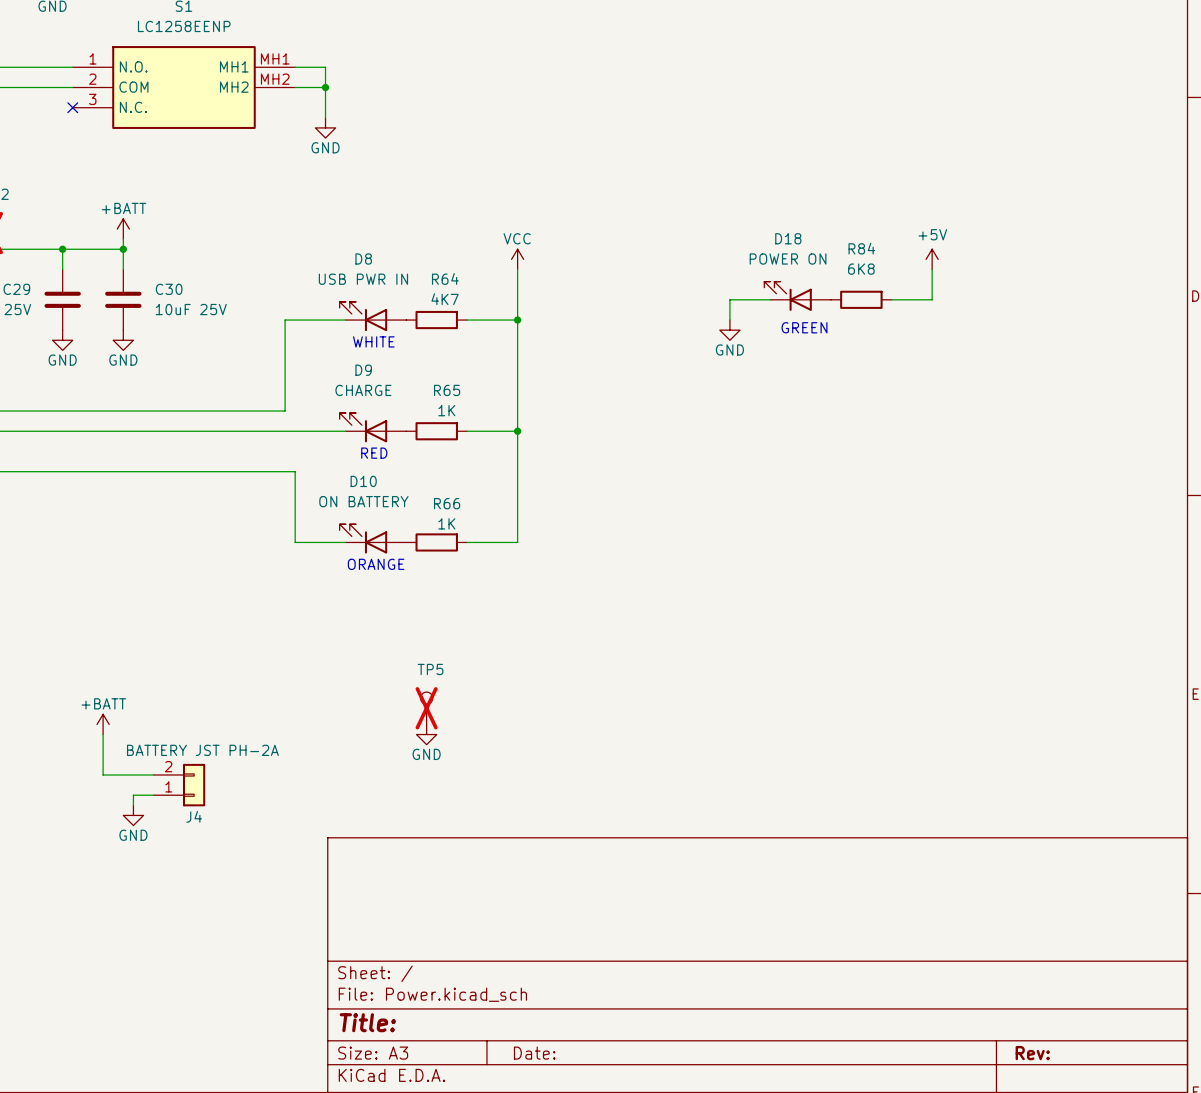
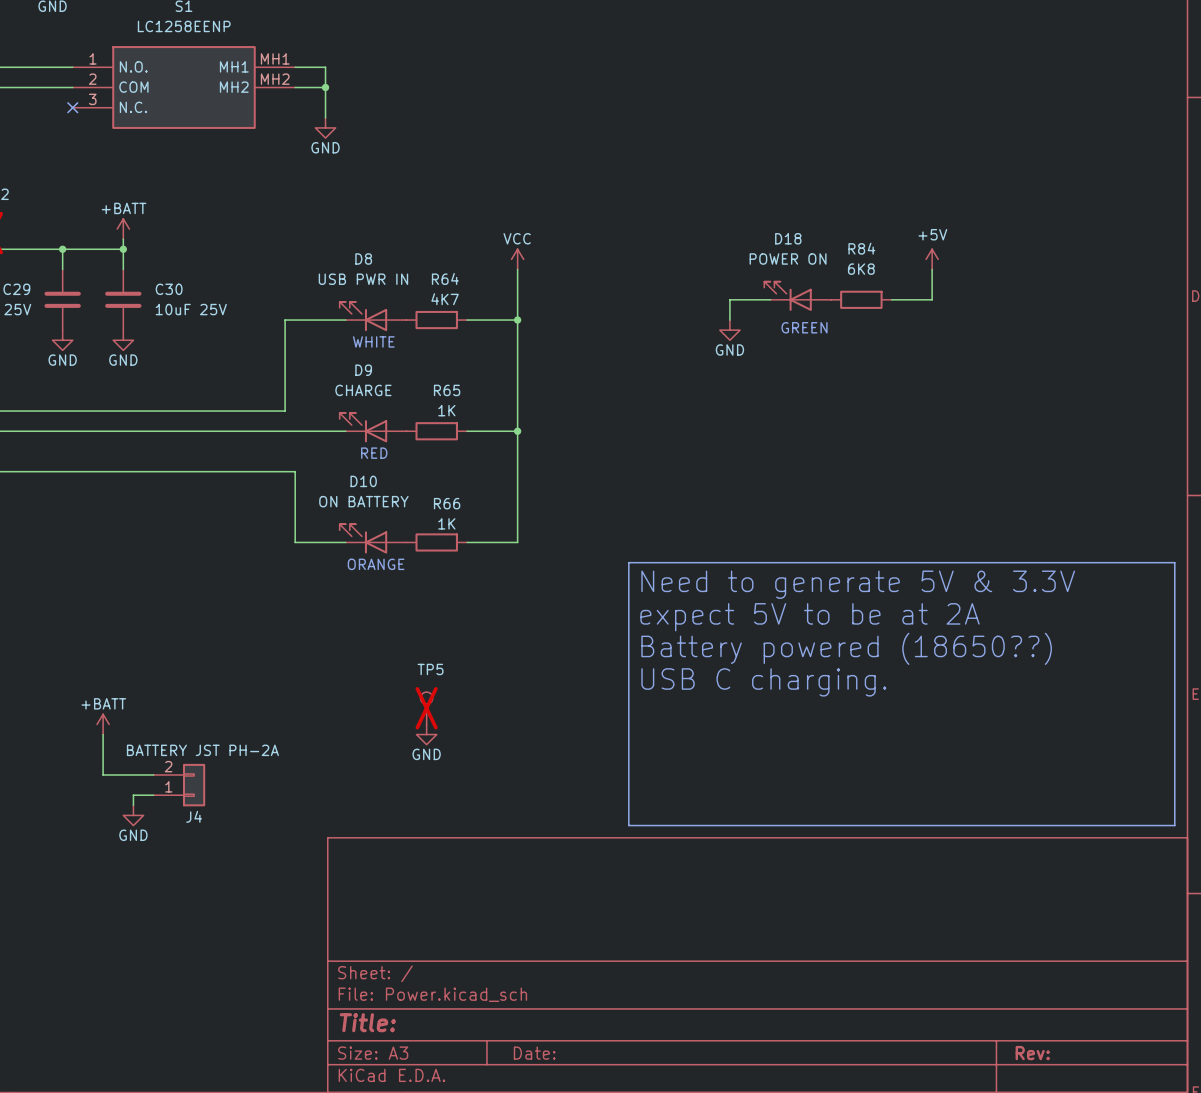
line: none -> (628, 562) (1174, 562) (1174, 825) (628, 825) (628, 562)
text: none -> Need to generate 5V & 3.3V (858, 584)
text: none -> expect 5V to be at 2A (810, 617)
text: none -> Battery powered (18650??) (846, 648)
text: none -> USB C charging. (763, 682)

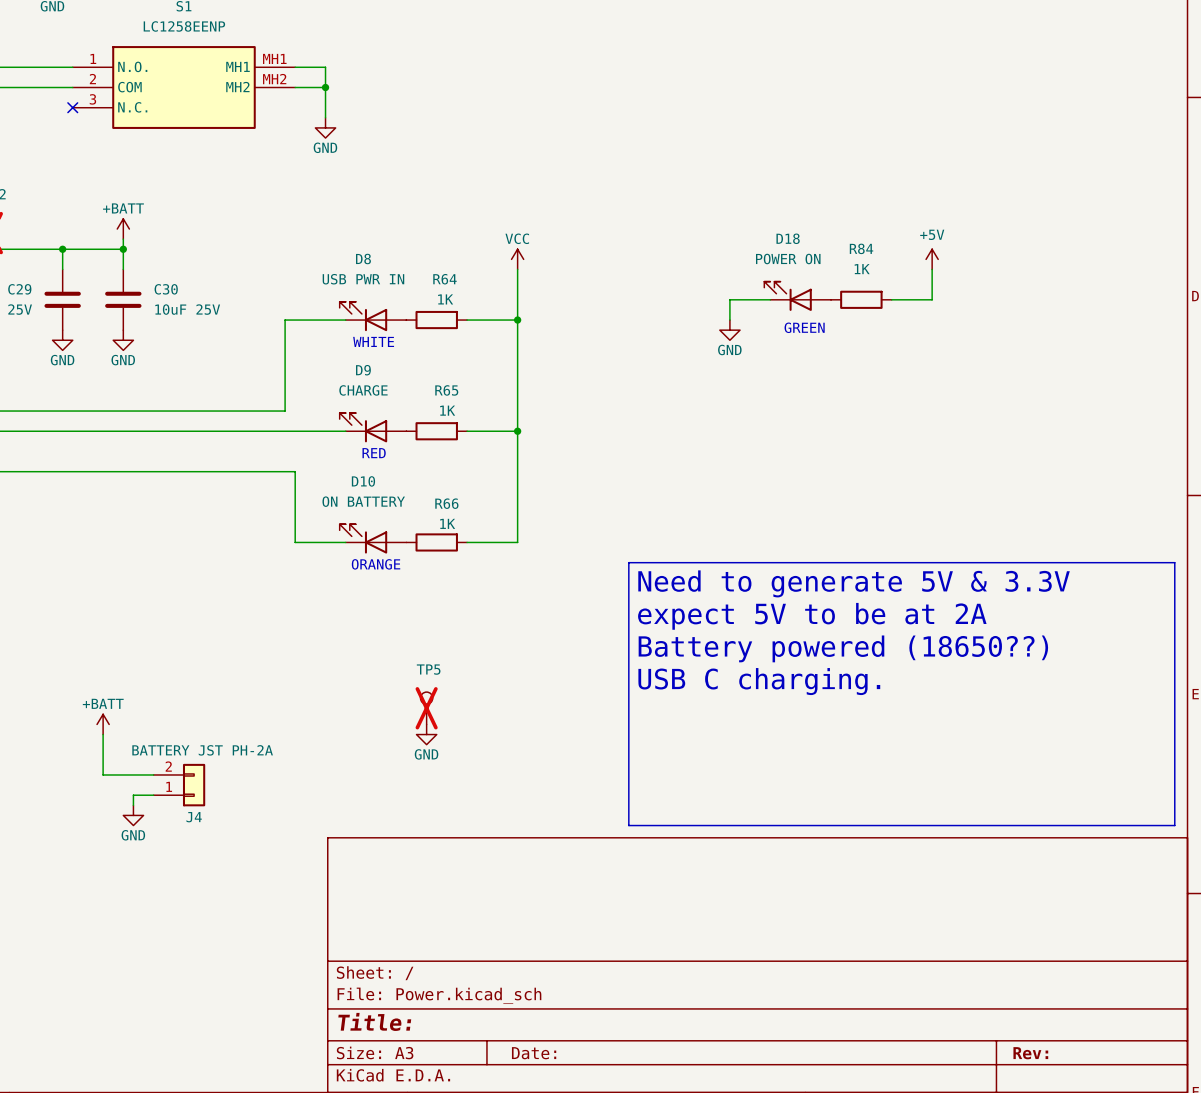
R84 value: 6K8 (861, 269) -> 1K (862, 269)
R64 value: 4K7 (445, 299) -> 1K (445, 299)

